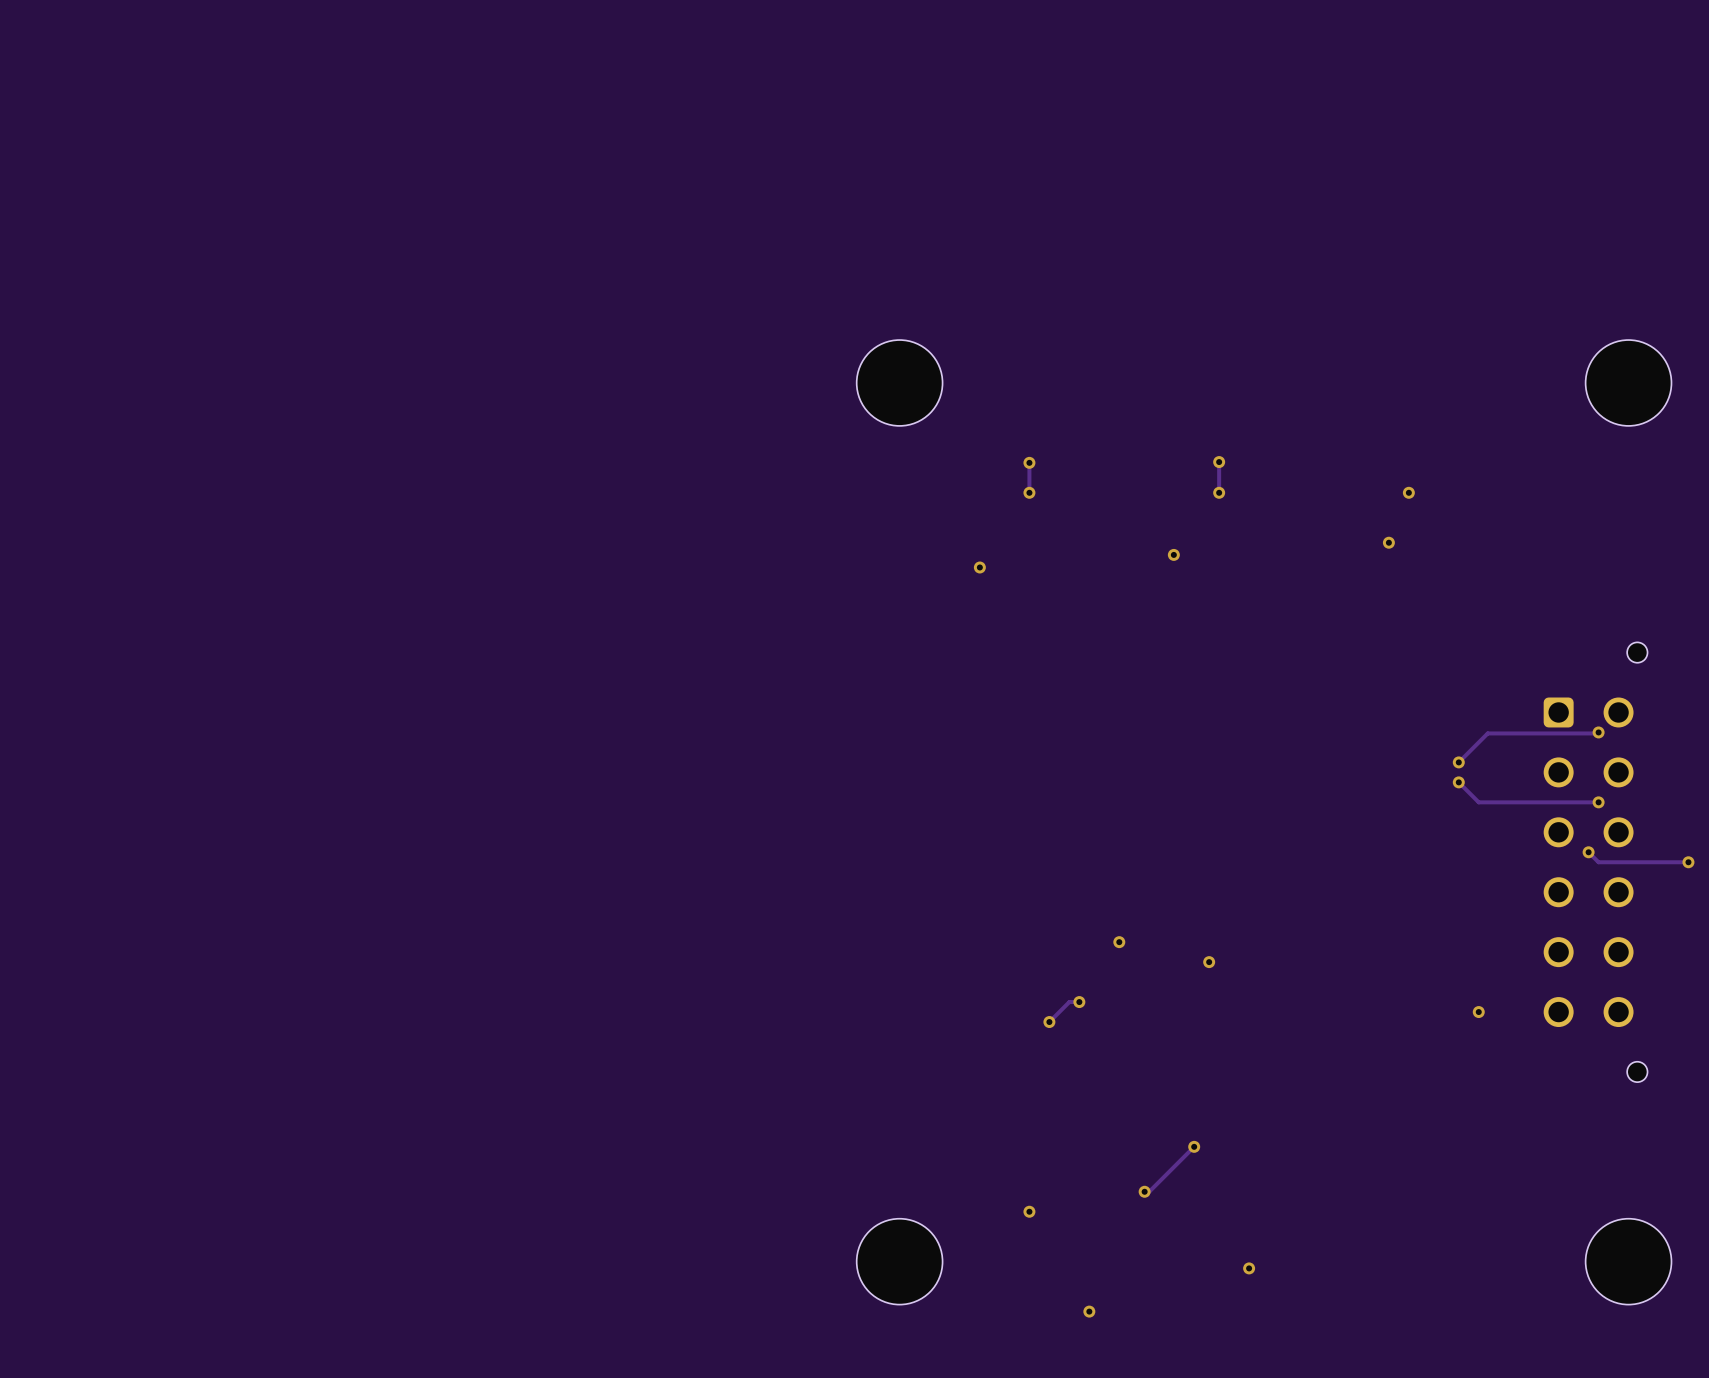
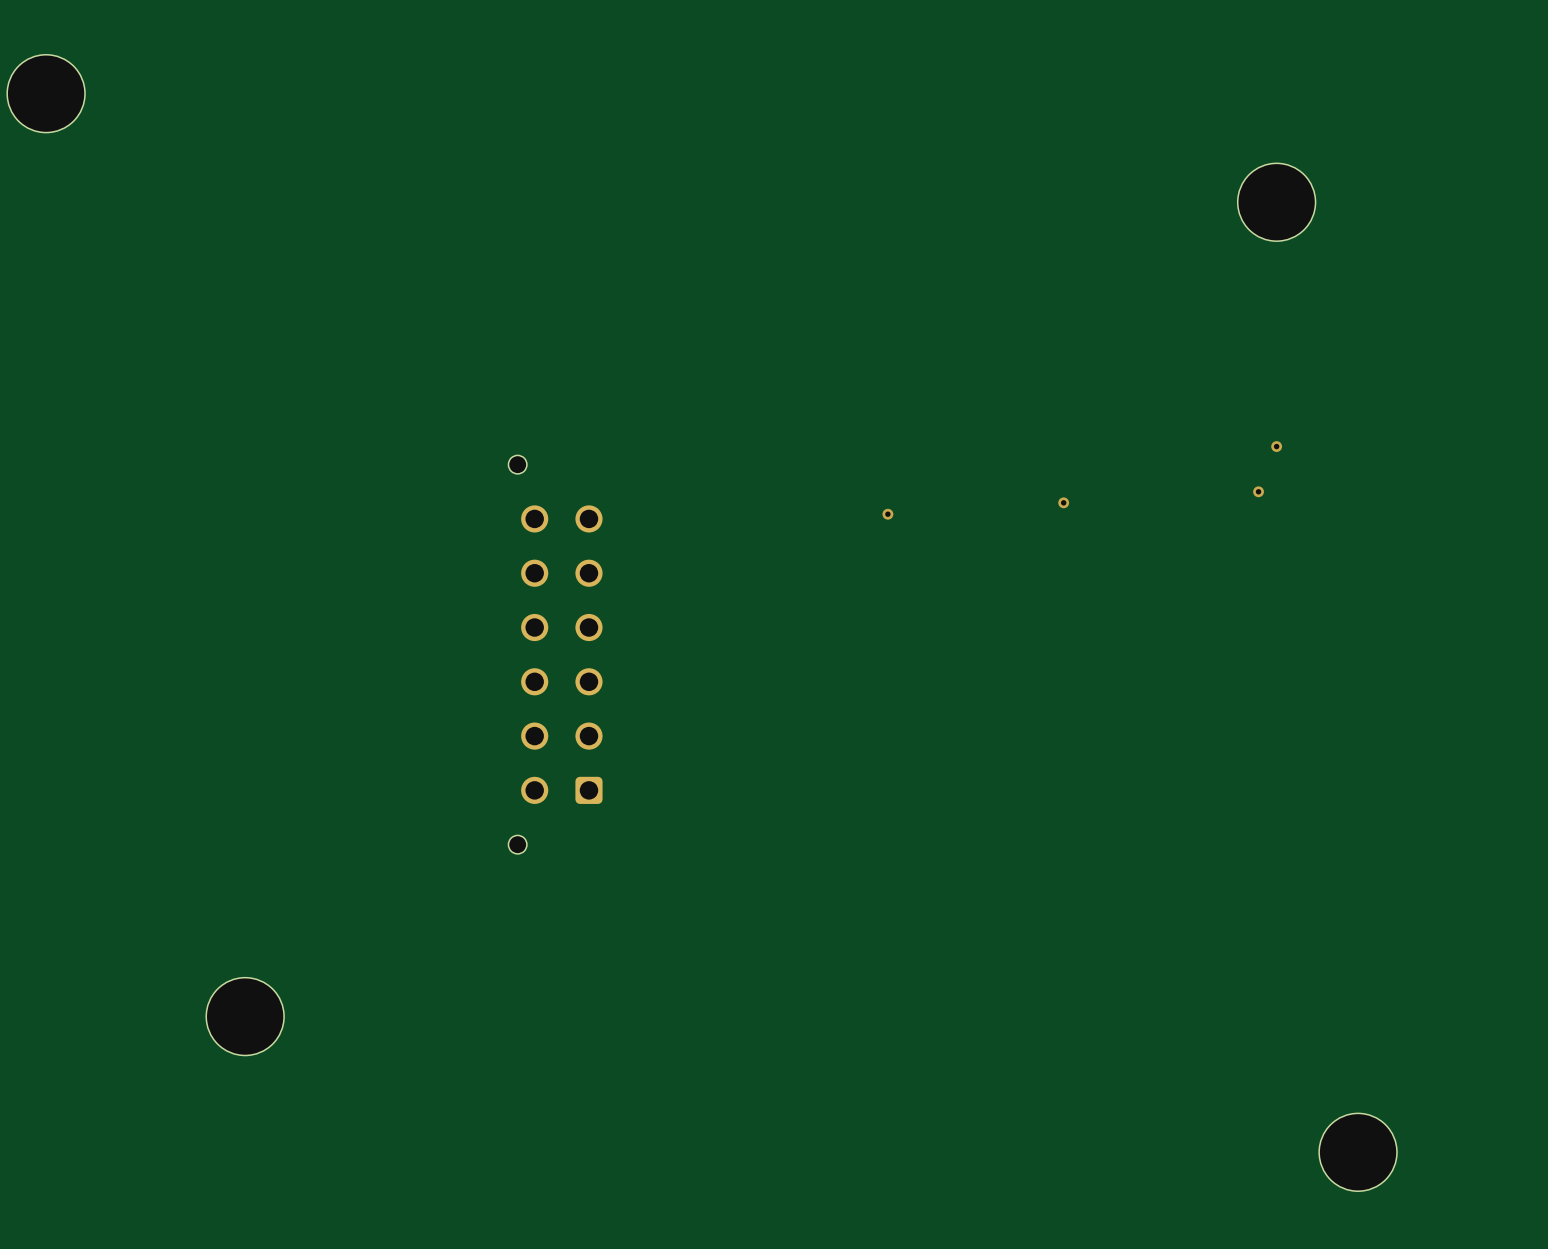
part: none -> (46, 93)
part: none -> (1276, 202)
part: (899, 382) -> none
part: (1628, 382) -> none
track: (1029, 462) (1029, 492) -> none
via: (1029, 462) -> none
track: (1219, 462) (1219, 492) -> none
via: (1219, 462) -> none
via: (1029, 492) -> none
via: (1219, 492) -> none
part: none -> (555, 654)
track: (1598, 732) (1487, 733) (1458, 762) -> none
via: (1598, 732) -> none
via: (1458, 762) -> none
track: (1458, 782) (1478, 802) (1598, 802) -> none
via: (1458, 782) -> none
via: (1598, 802) -> none
track: (1588, 852) (1598, 862) (1688, 862) -> none
via: (1588, 852) -> none
part: (1595, 862) -> none
via: (1688, 862) -> none
via: (1119, 942) -> none
via: (1209, 962) -> none
track: (1079, 1002) (1069, 1002) (1049, 1022) -> none
via: (1079, 1002) -> none
via: (1478, 1012) -> none
via: (1049, 1022) -> none
part: none -> (245, 1016)
track: (1194, 1146) (1149, 1191) (1144, 1191) -> none
via: (1194, 1146) -> none
via: (1144, 1191) -> none
via: (1029, 1211) -> none
part: (899, 1261) -> none
part position: (1628, 1261) -> (1358, 1152)
via: (1249, 1268) -> none
via: (1089, 1311) -> none

